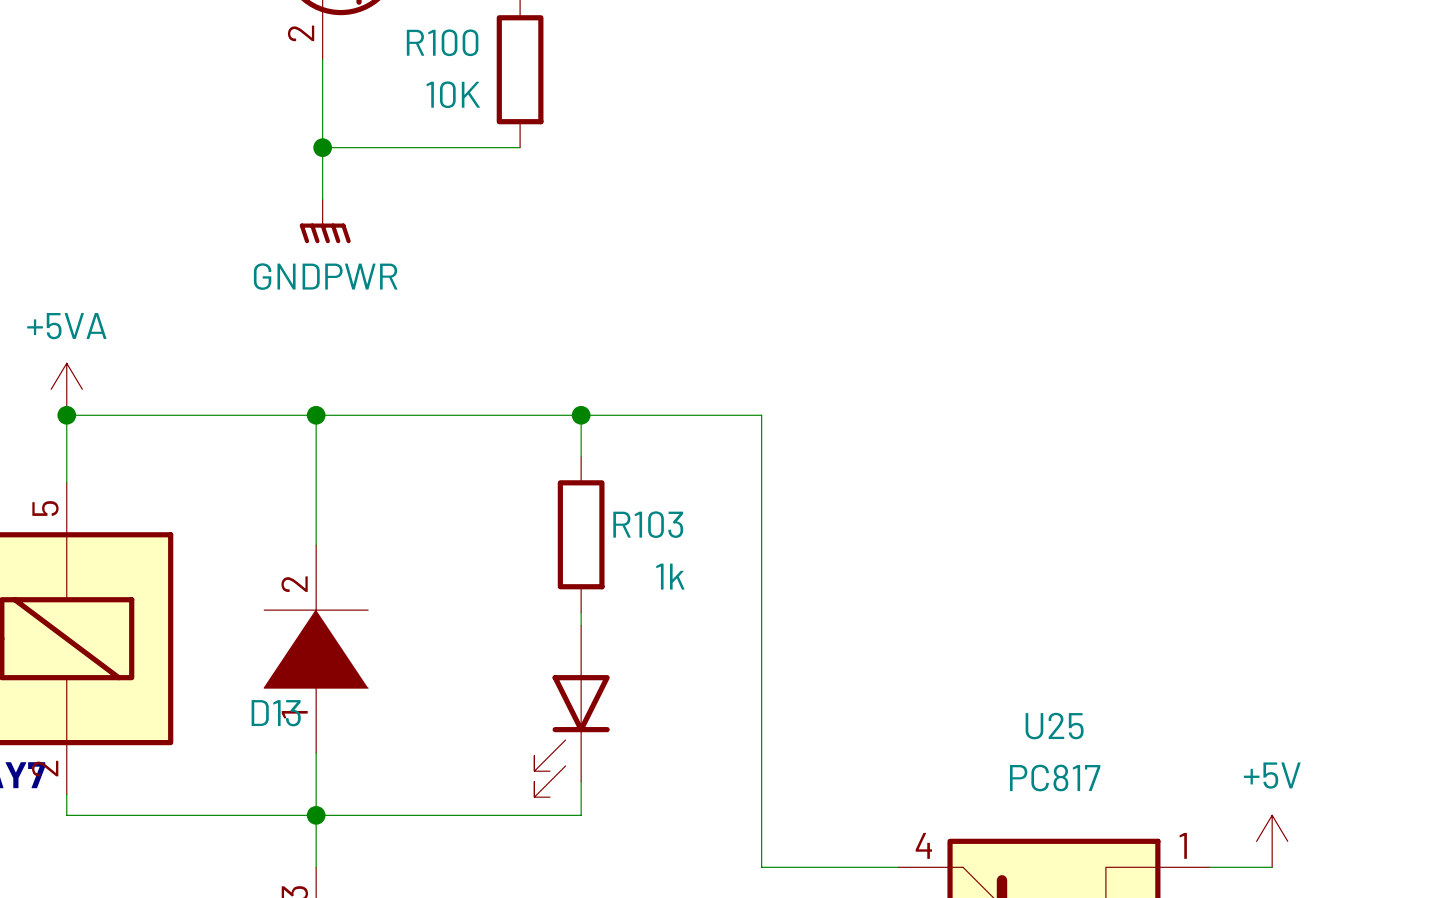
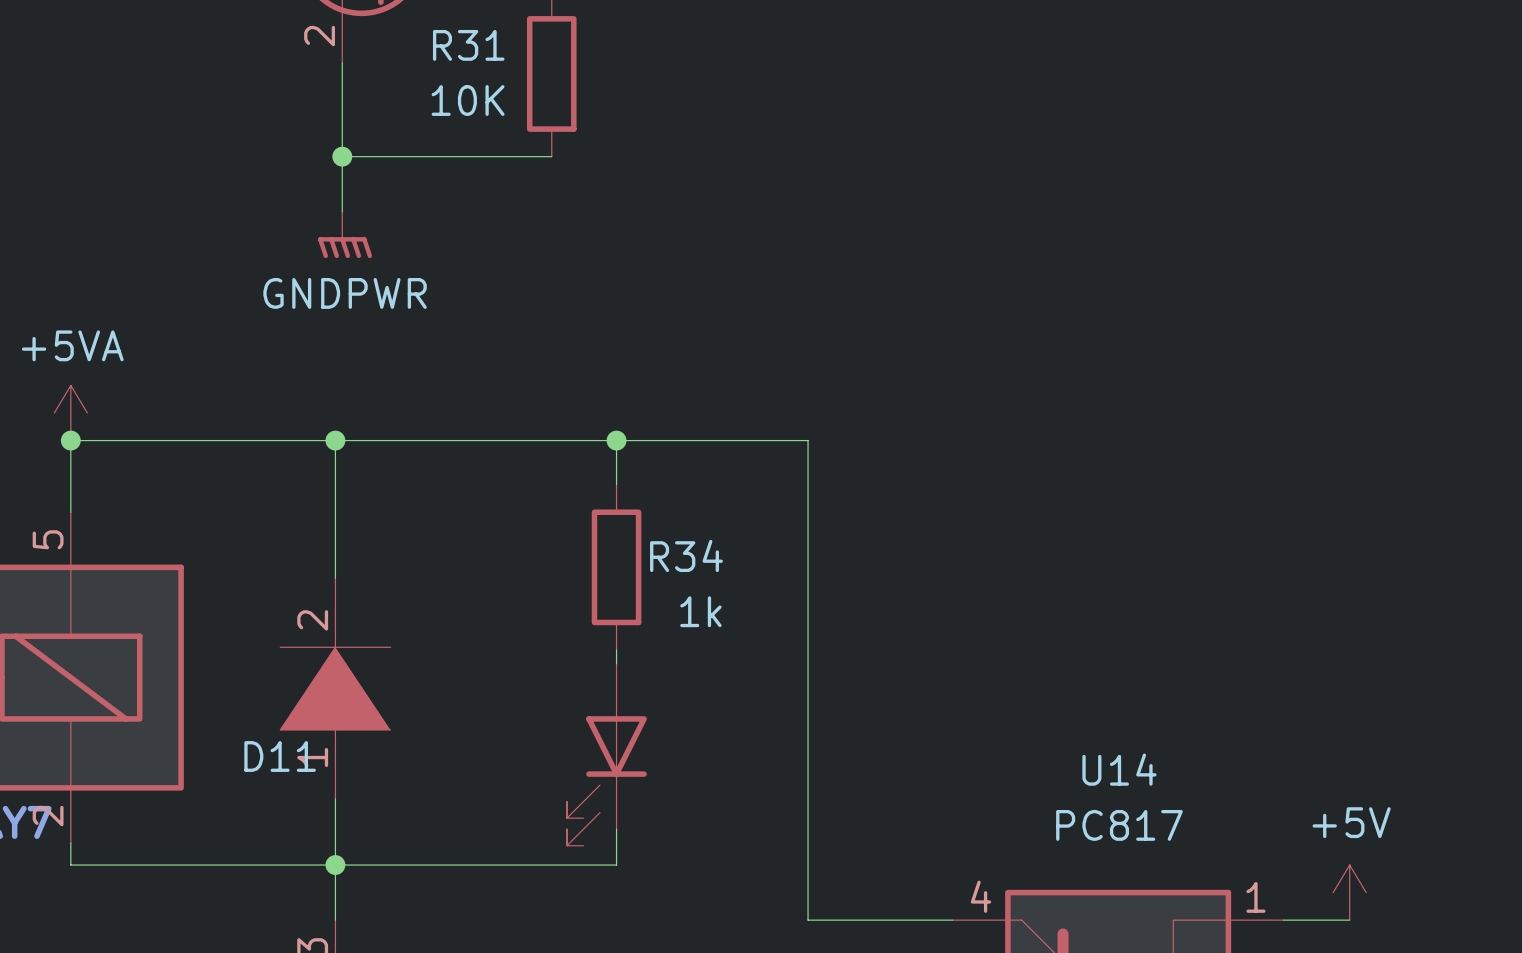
R100 name: R100 (442, 42) -> R31 (468, 45)
R103 name: R103 (648, 524) -> R34 (686, 555)
D13 name: D13 (276, 713) -> D11 (280, 756)
U25 name: U25 (1054, 726) -> U14 (1119, 769)

